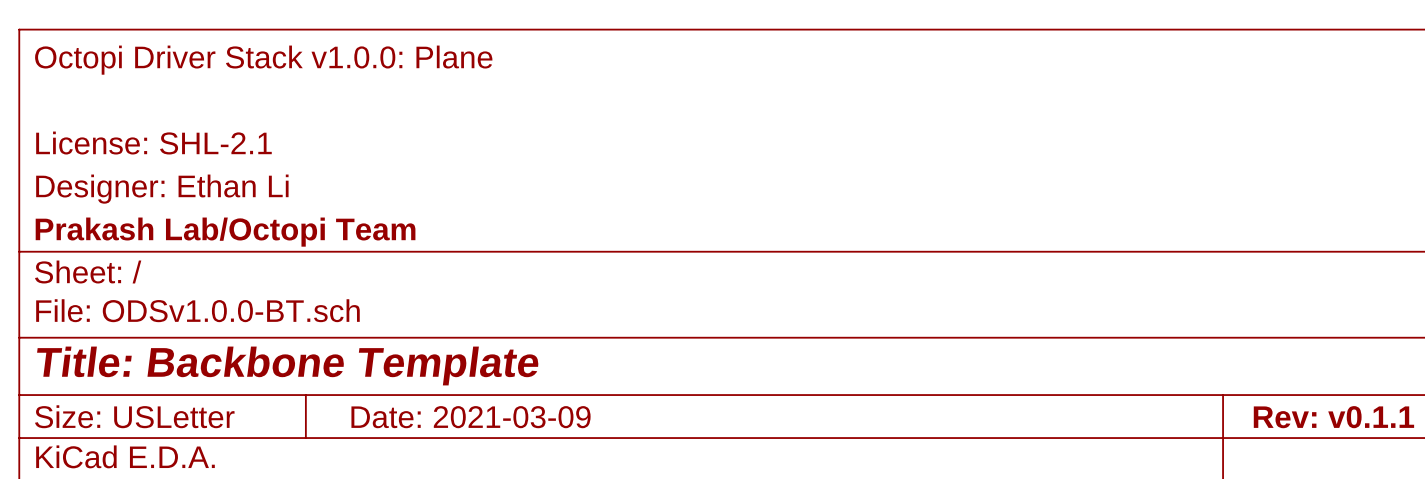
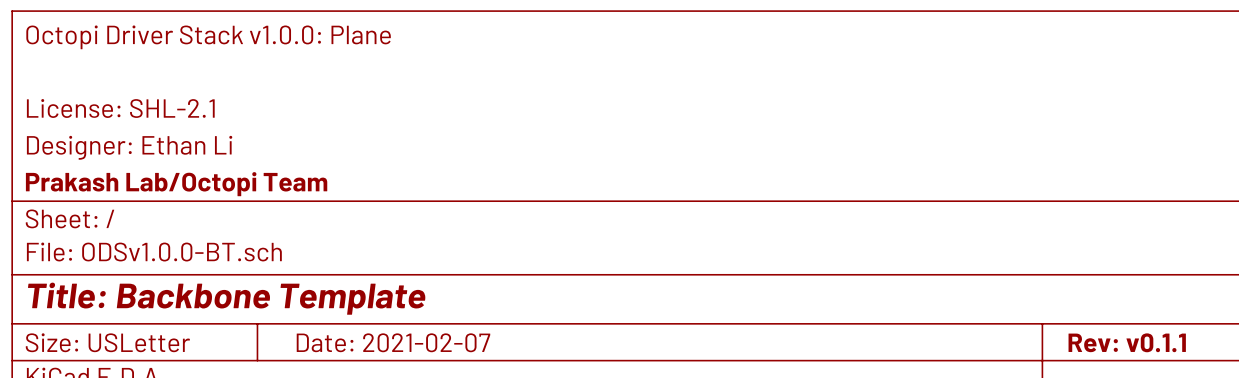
title block: Date: 2021-03-09 (471, 417) -> Date: 2021-02-07 (393, 342)

